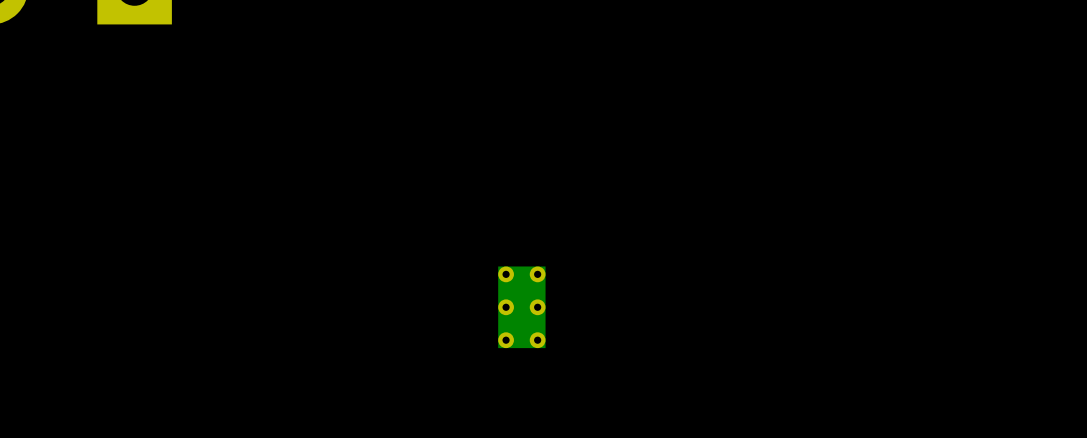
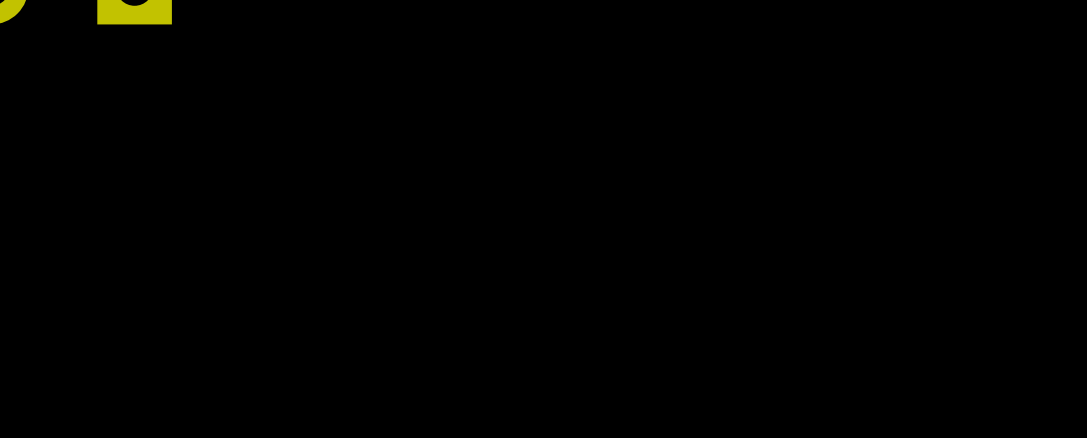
part: (521, 307) -> none

